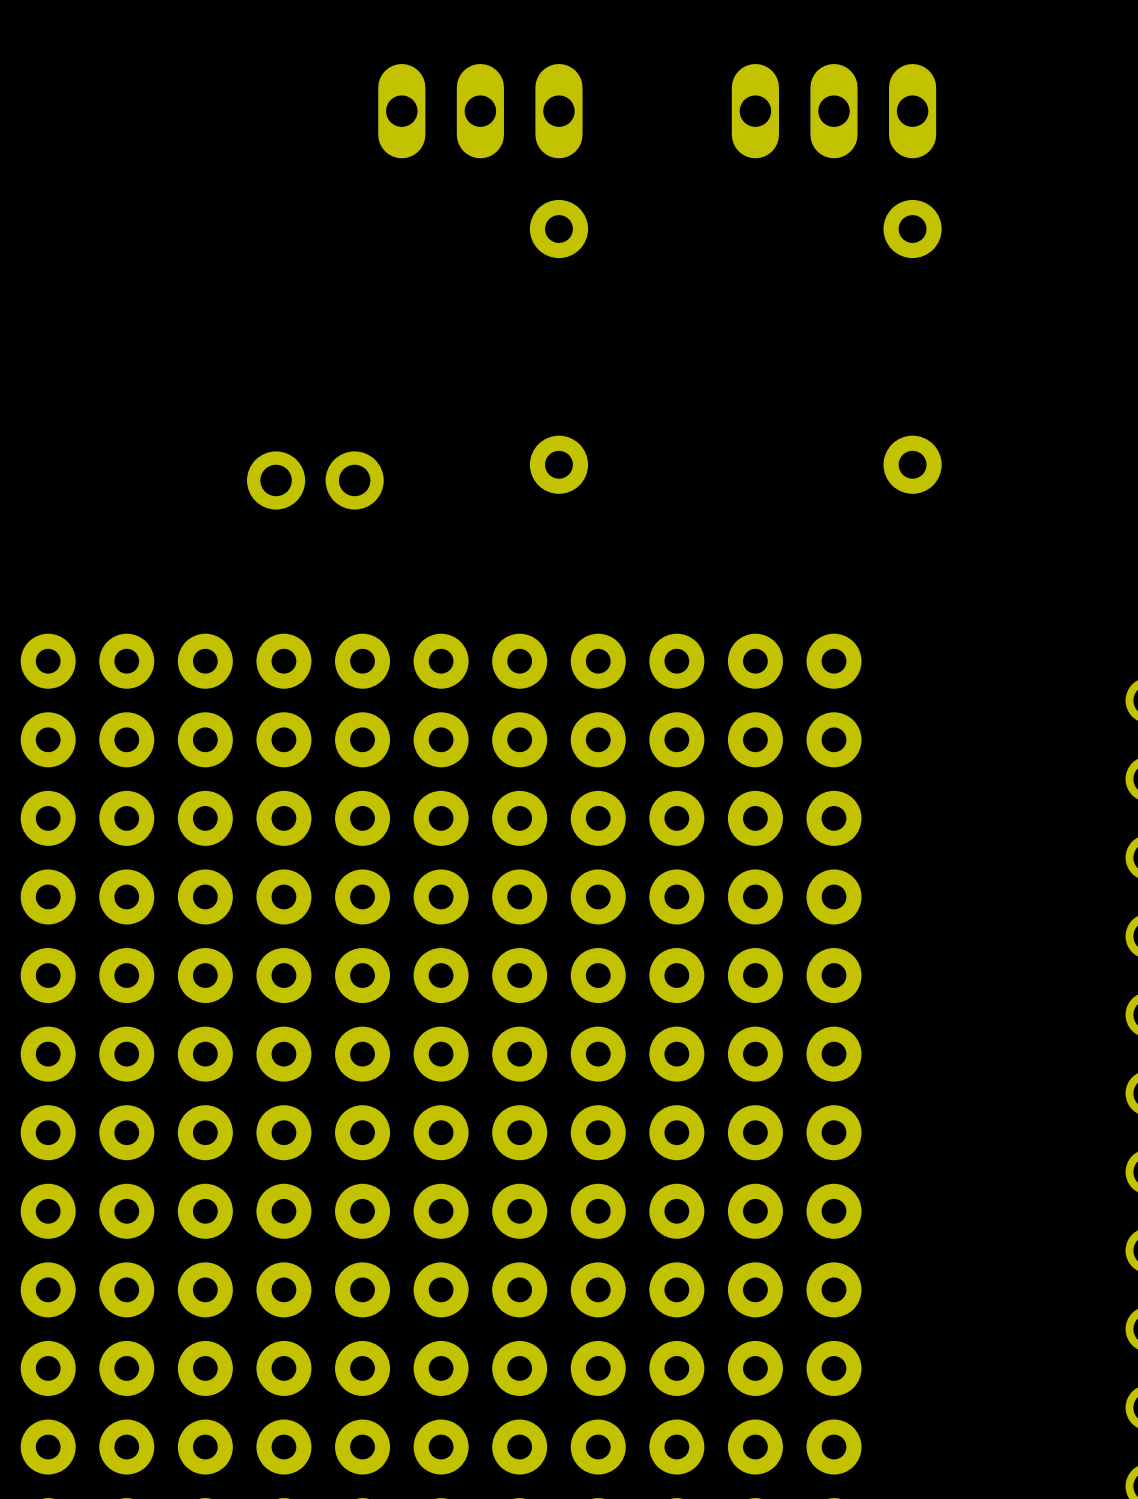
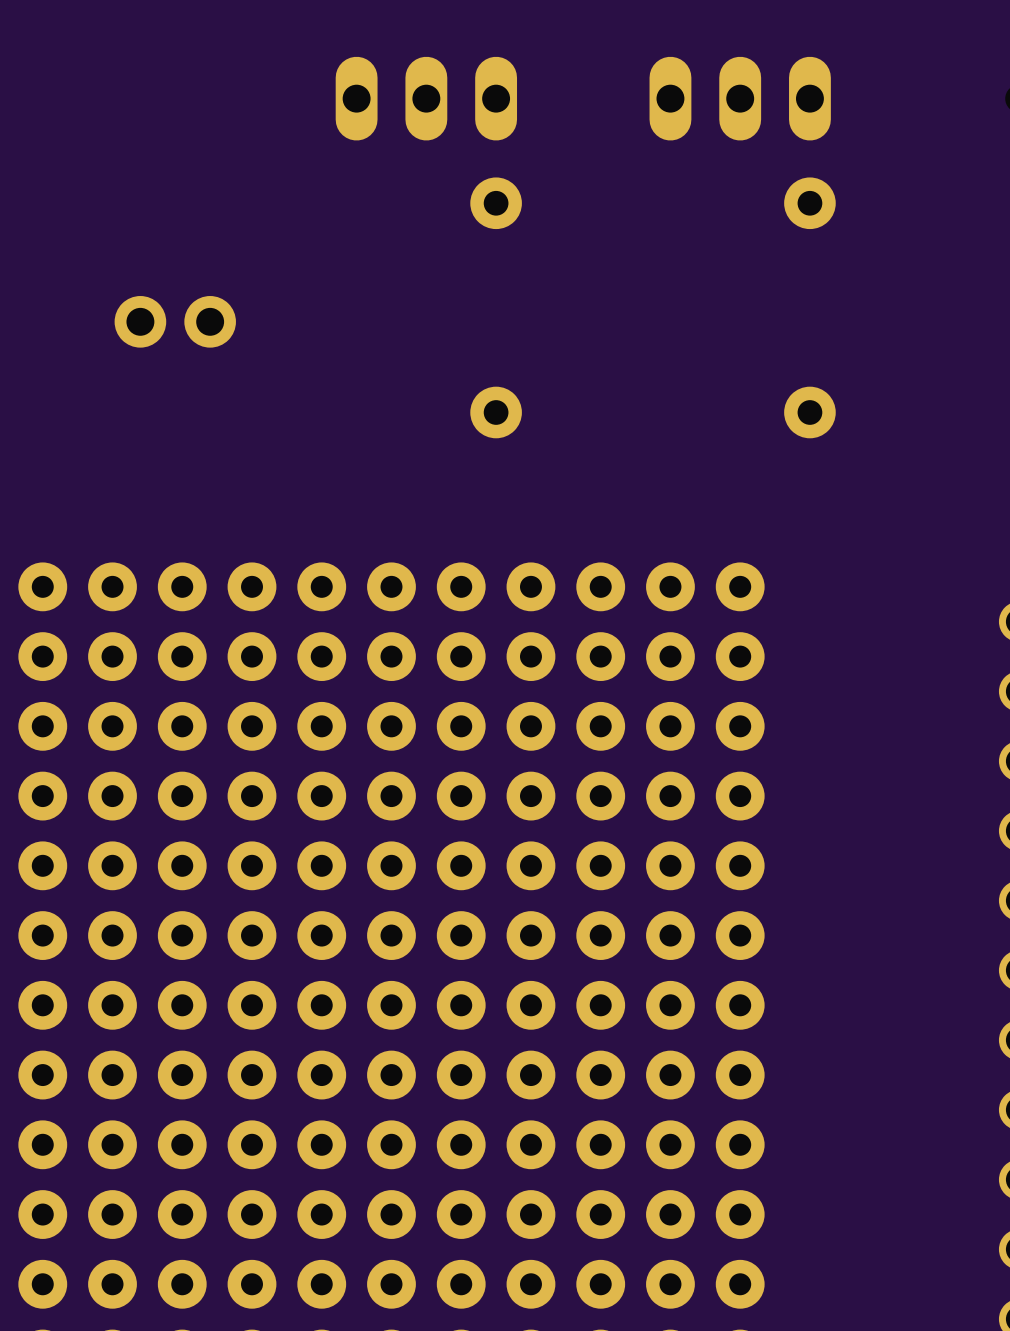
part position: (315, 480) -> (175, 321)

